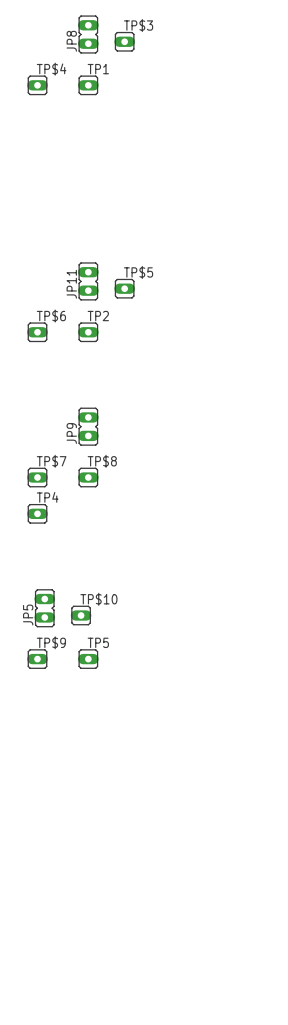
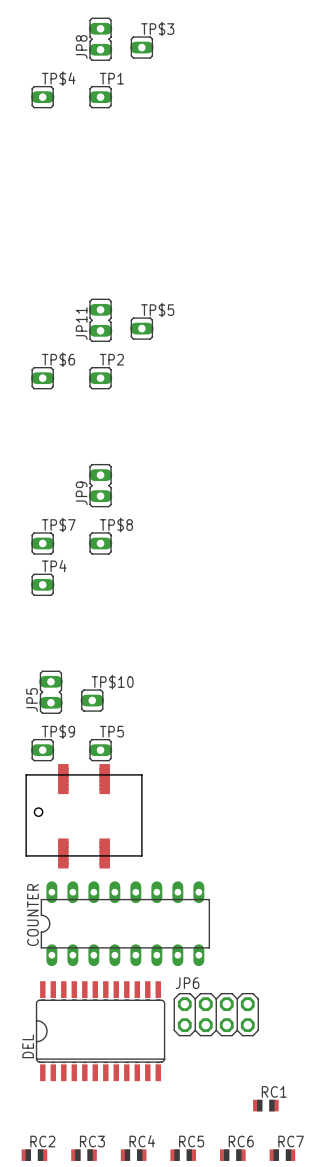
part: none -> (84, 816)
COUNTER: none -> (125, 923)
JP6: none -> (216, 1014)
DEL: none -> (100, 1031)
RC1: none -> (265, 1105)
RC2: none -> (34, 1155)
RC3: none -> (84, 1155)
RC4: none -> (133, 1155)
RC5: none -> (183, 1155)
RC6: none -> (232, 1155)
RC7: none -> (282, 1155)

